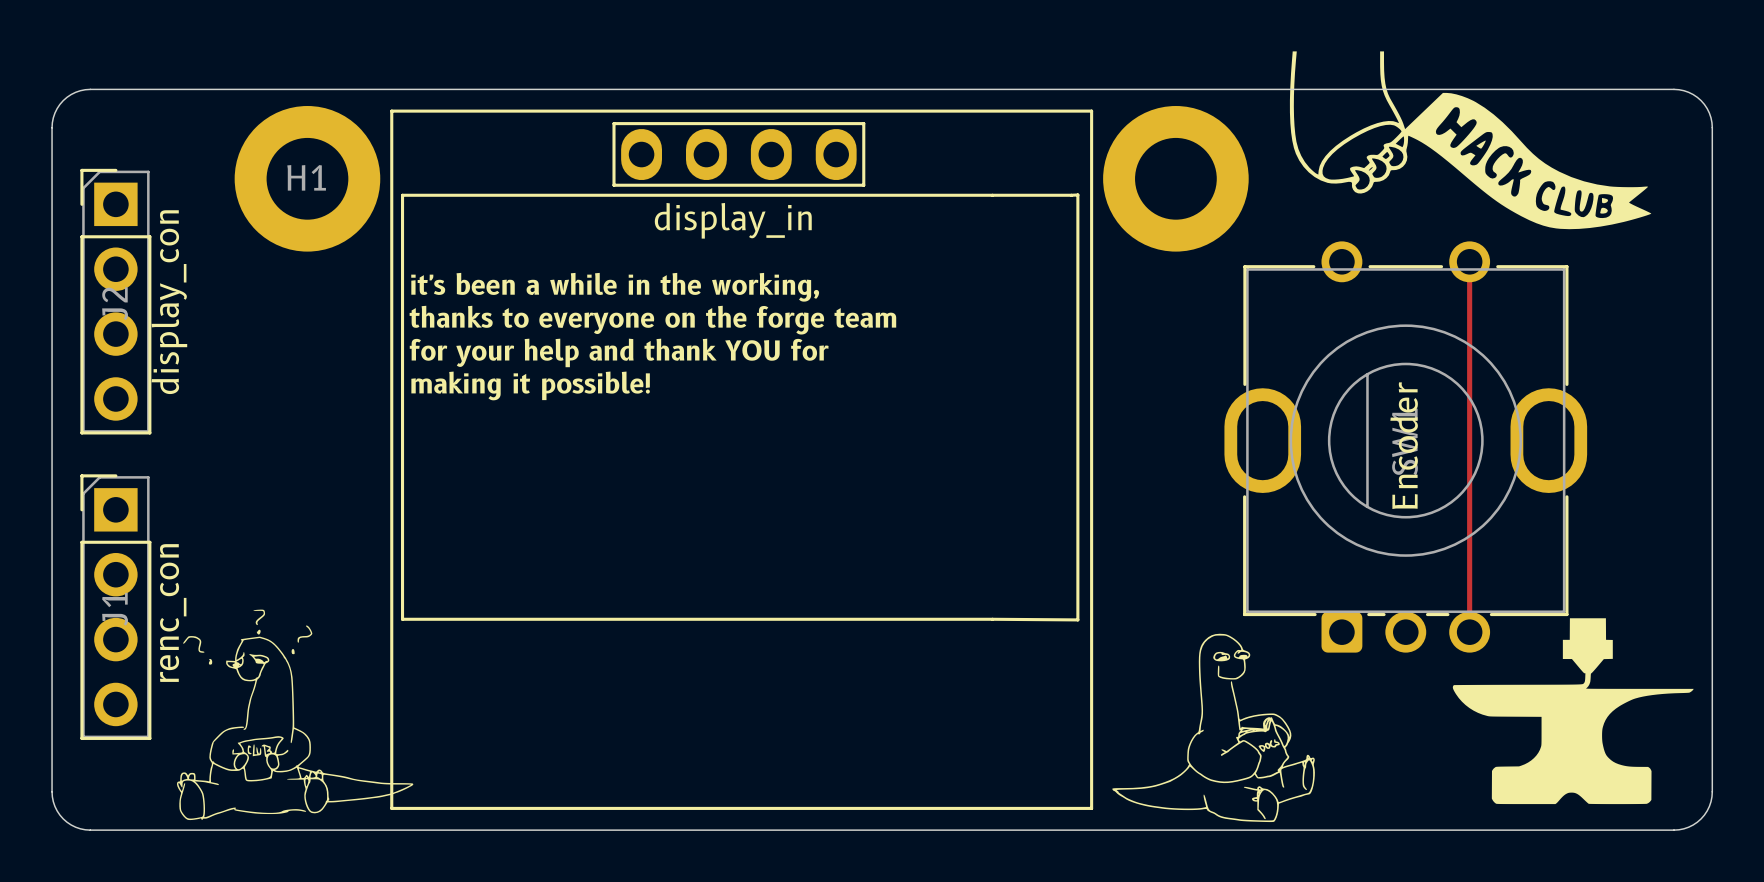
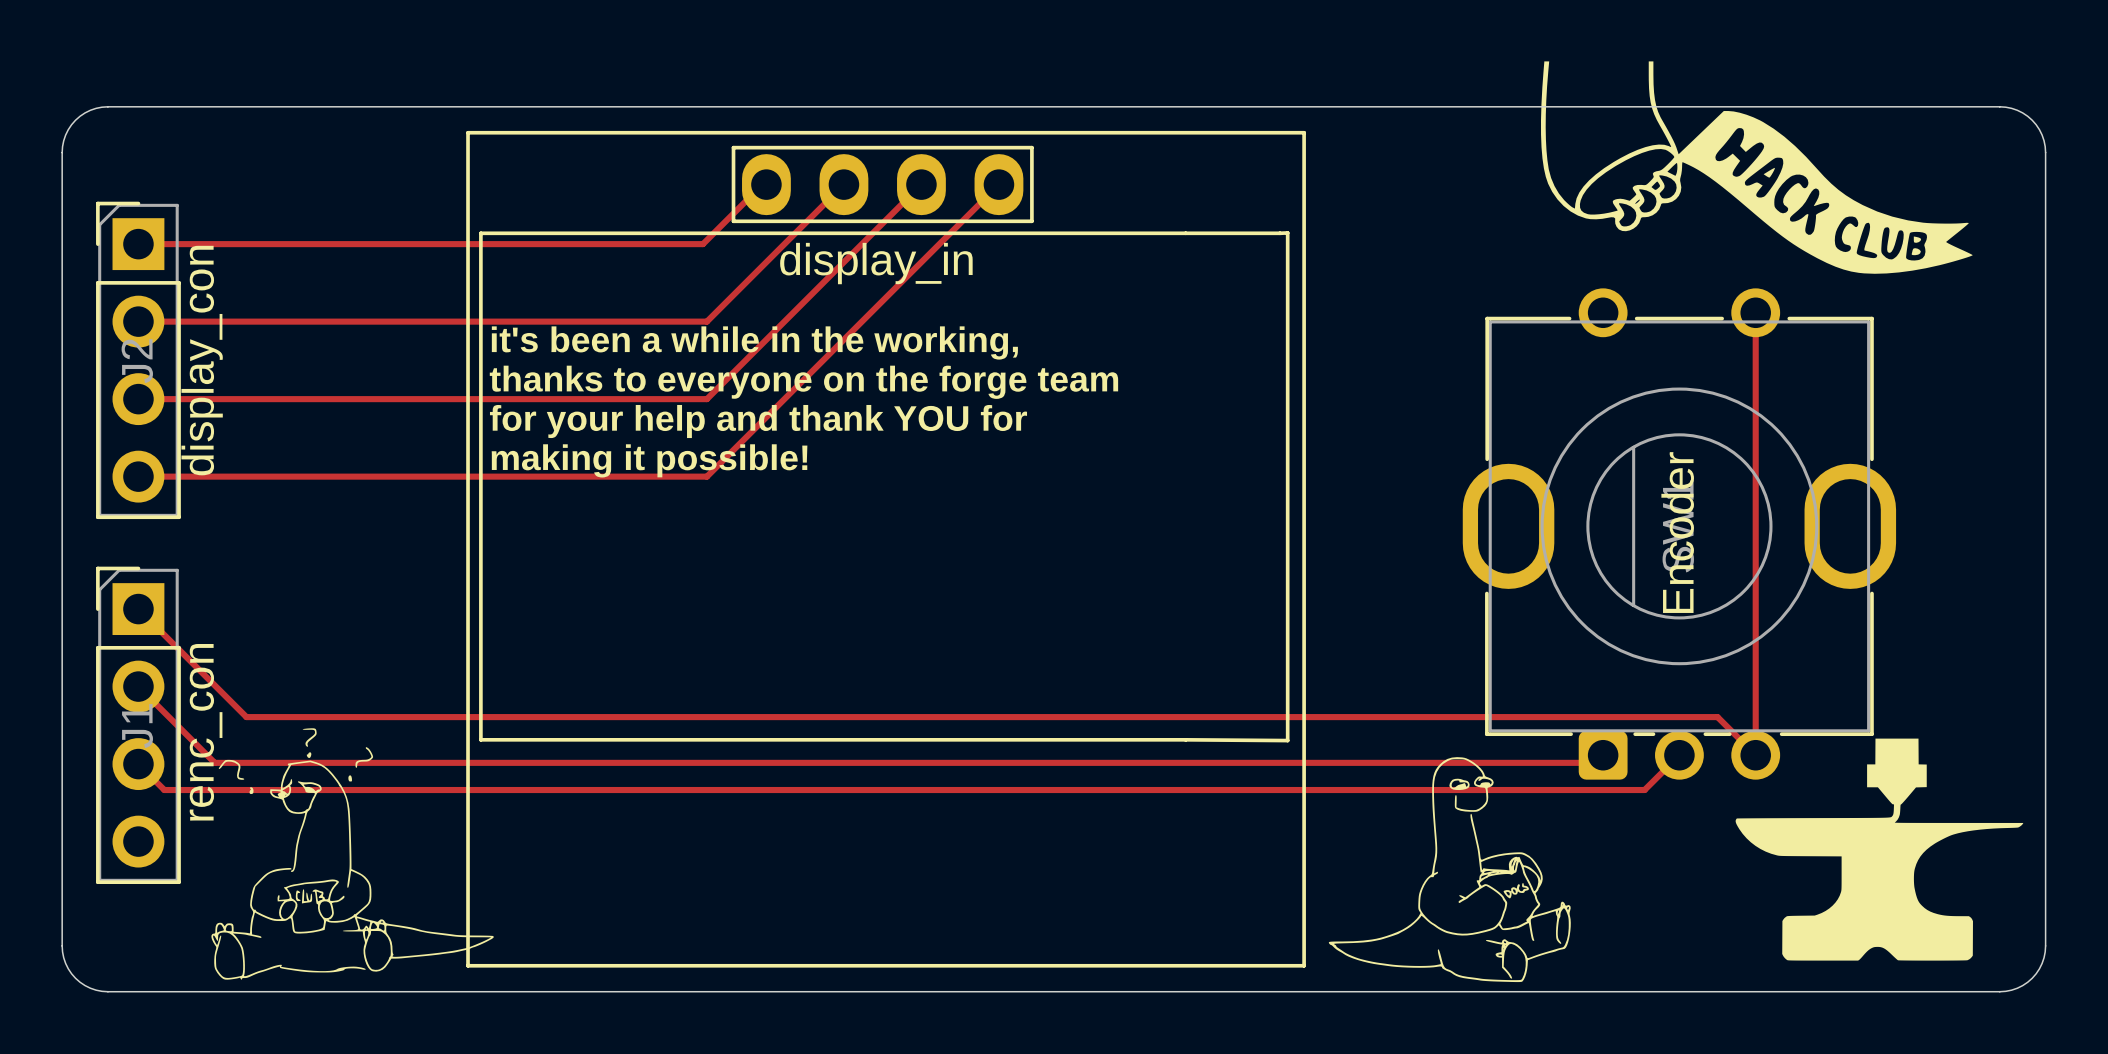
track: none -> (766, 184) (762, 184) (702, 244) (138, 244)
track: none -> (843, 184) (706, 321) (138, 321)
track: none -> (921, 184) (706, 399) (138, 399)
track: none -> (998, 184) (706, 476) (138, 476)
H1: (307, 178) -> none
part: (1175, 178) -> none
track: none -> (138, 609) (246, 717) (1717, 717) (1755, 755)
track: none -> (138, 686) (214, 762) (1595, 762) (1603, 755)
track: none -> (1679, 755) (1644, 790) (164, 790) (138, 764)

